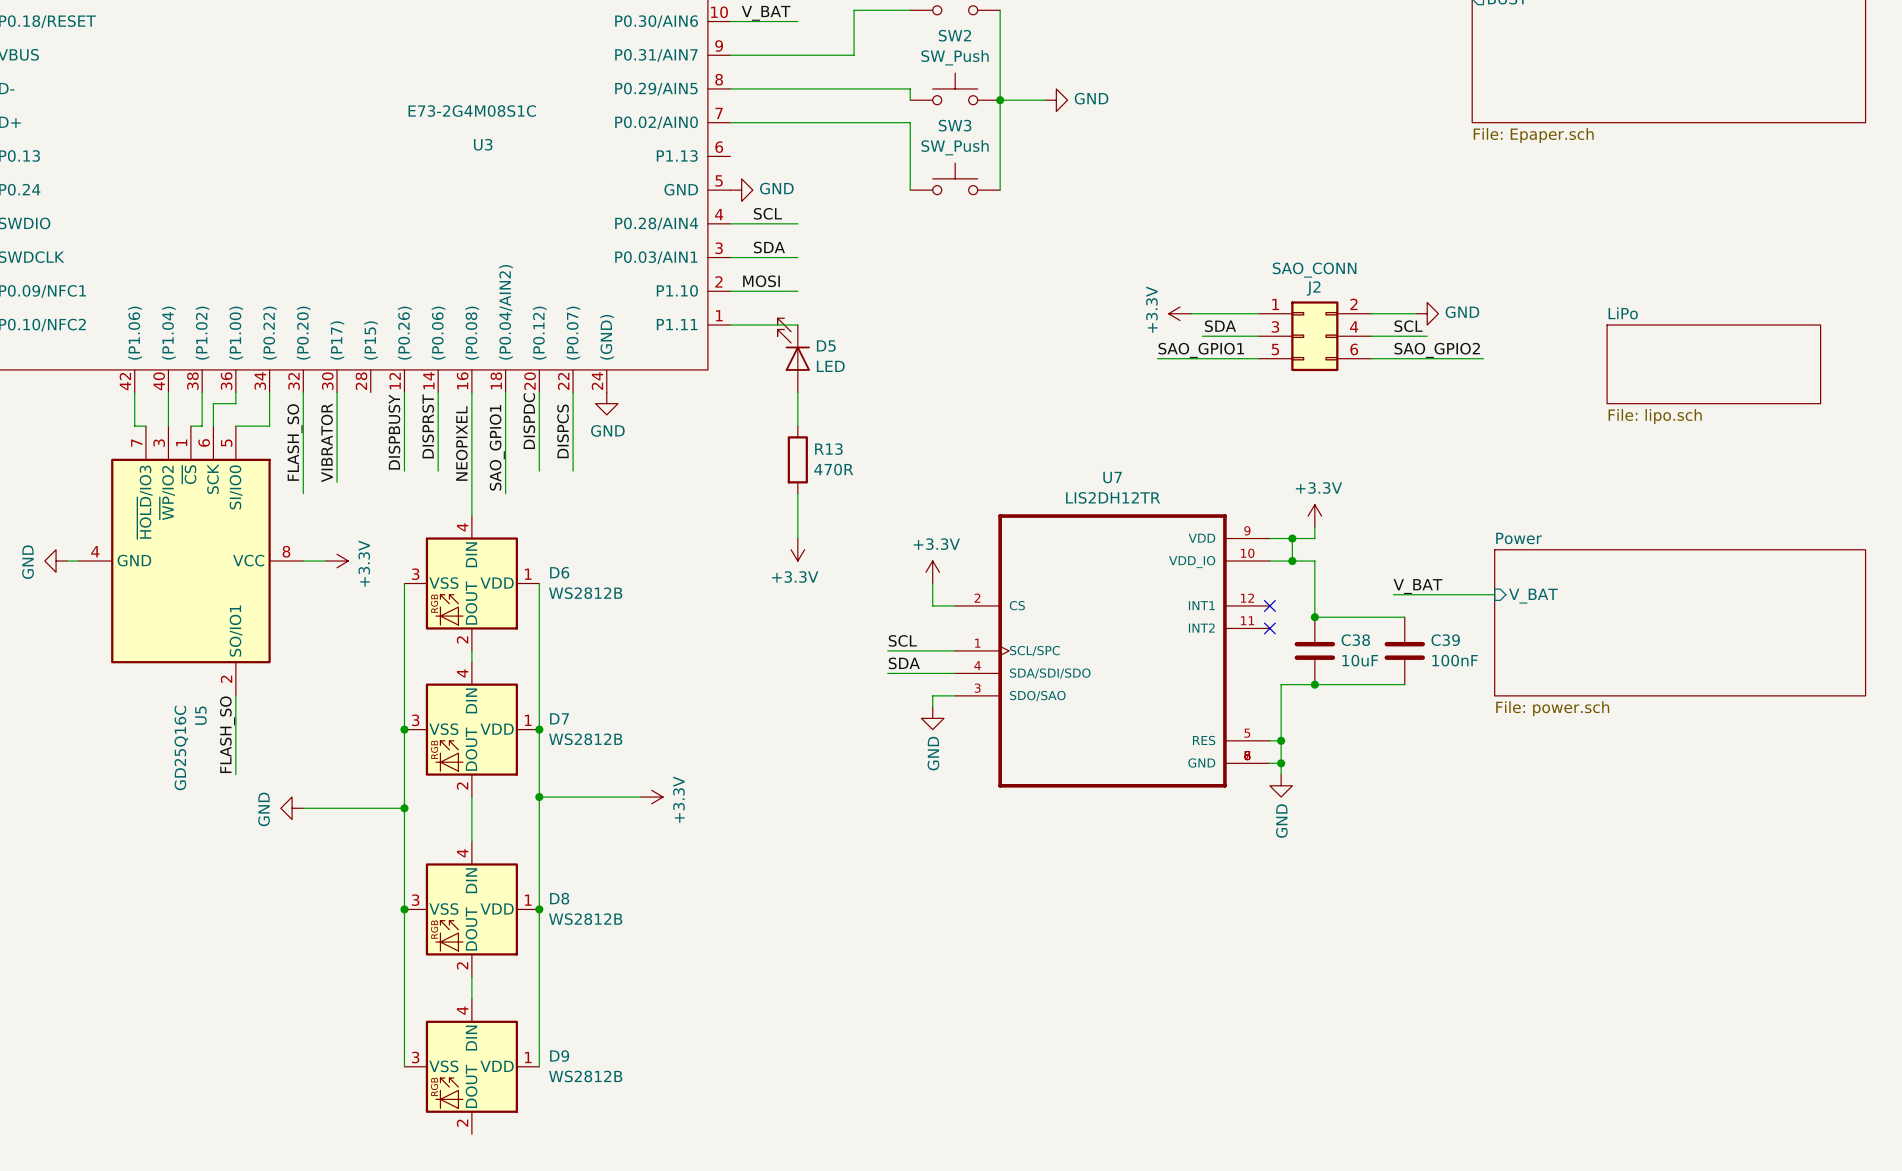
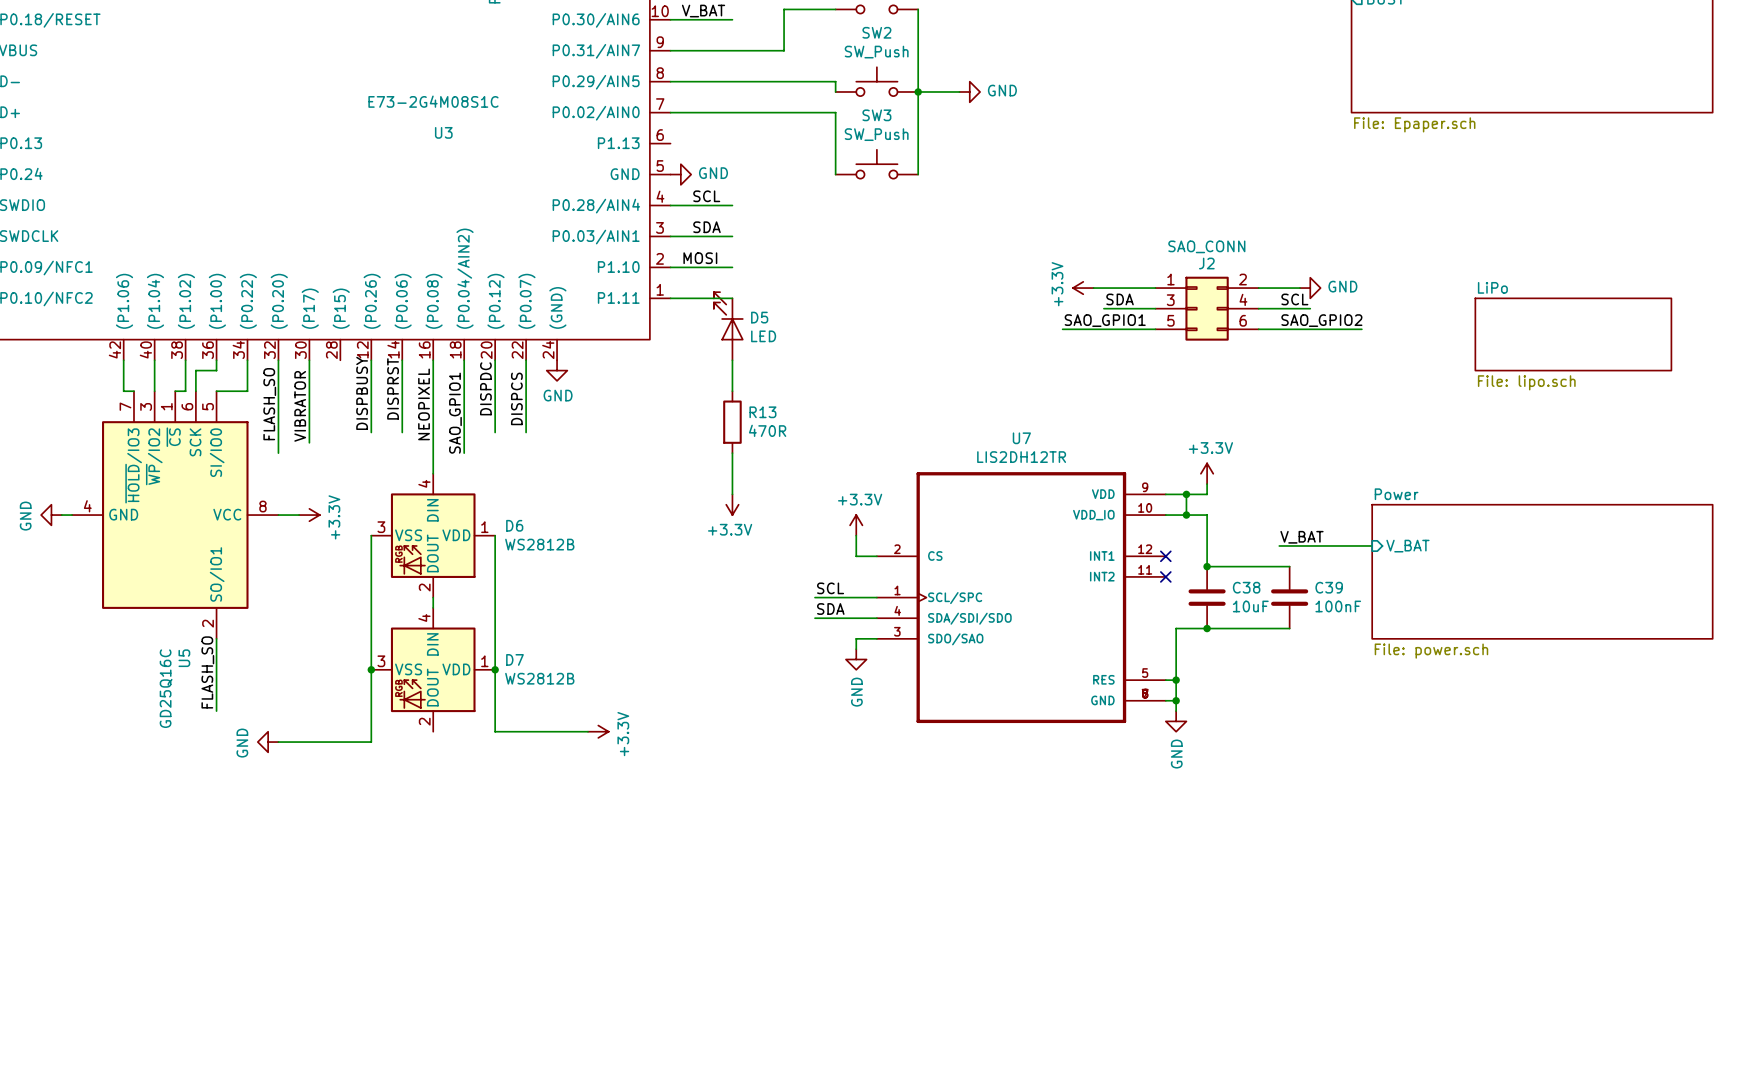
wire: (471, 797) (471, 842) -> none
wire: (539, 797) (539, 1066) -> none
junction: (539, 797) -> none
wire: (404, 808) (404, 1066) -> none
junction: (404, 808) -> none
junction: (404, 909) -> none
D8: WS2812B (471, 909) -> none
junction: (539, 909) -> none
wire: (471, 976) (471, 999) -> none
D9: WS2812B (471, 1066) -> none

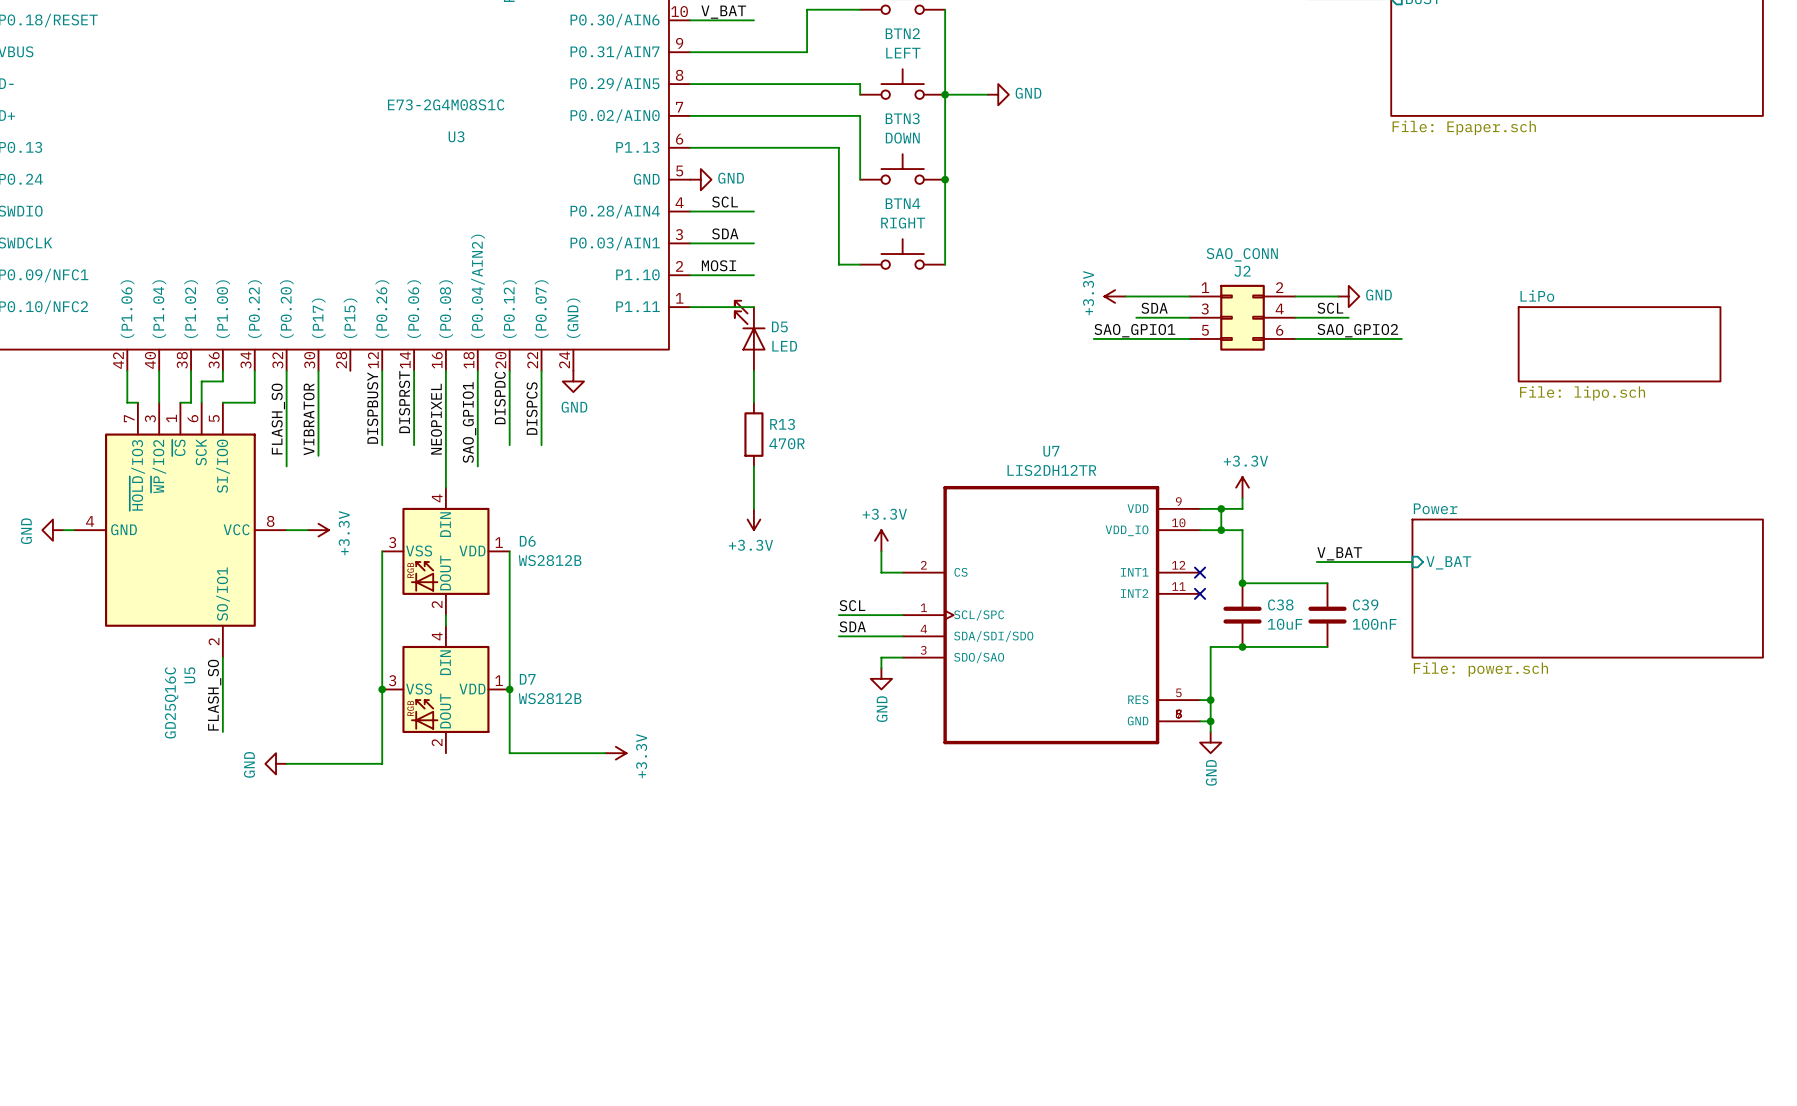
SW2 name: SW2 (876, 32) -> BTN2 (902, 33)
SW2 value: SW_Push (876, 52) -> LEFT (903, 53)
SW3 name: SW3 (876, 115) -> BTN3 (902, 118)
SW3 value: SW_Push (876, 134) -> DOWN (902, 138)
wire: none -> (690, 147) (838, 147) (838, 264) (860, 264)
wire: none -> (945, 179) (945, 264)
junction: none -> (945, 179)
BTN4: none -> RIGHT (902, 254)

